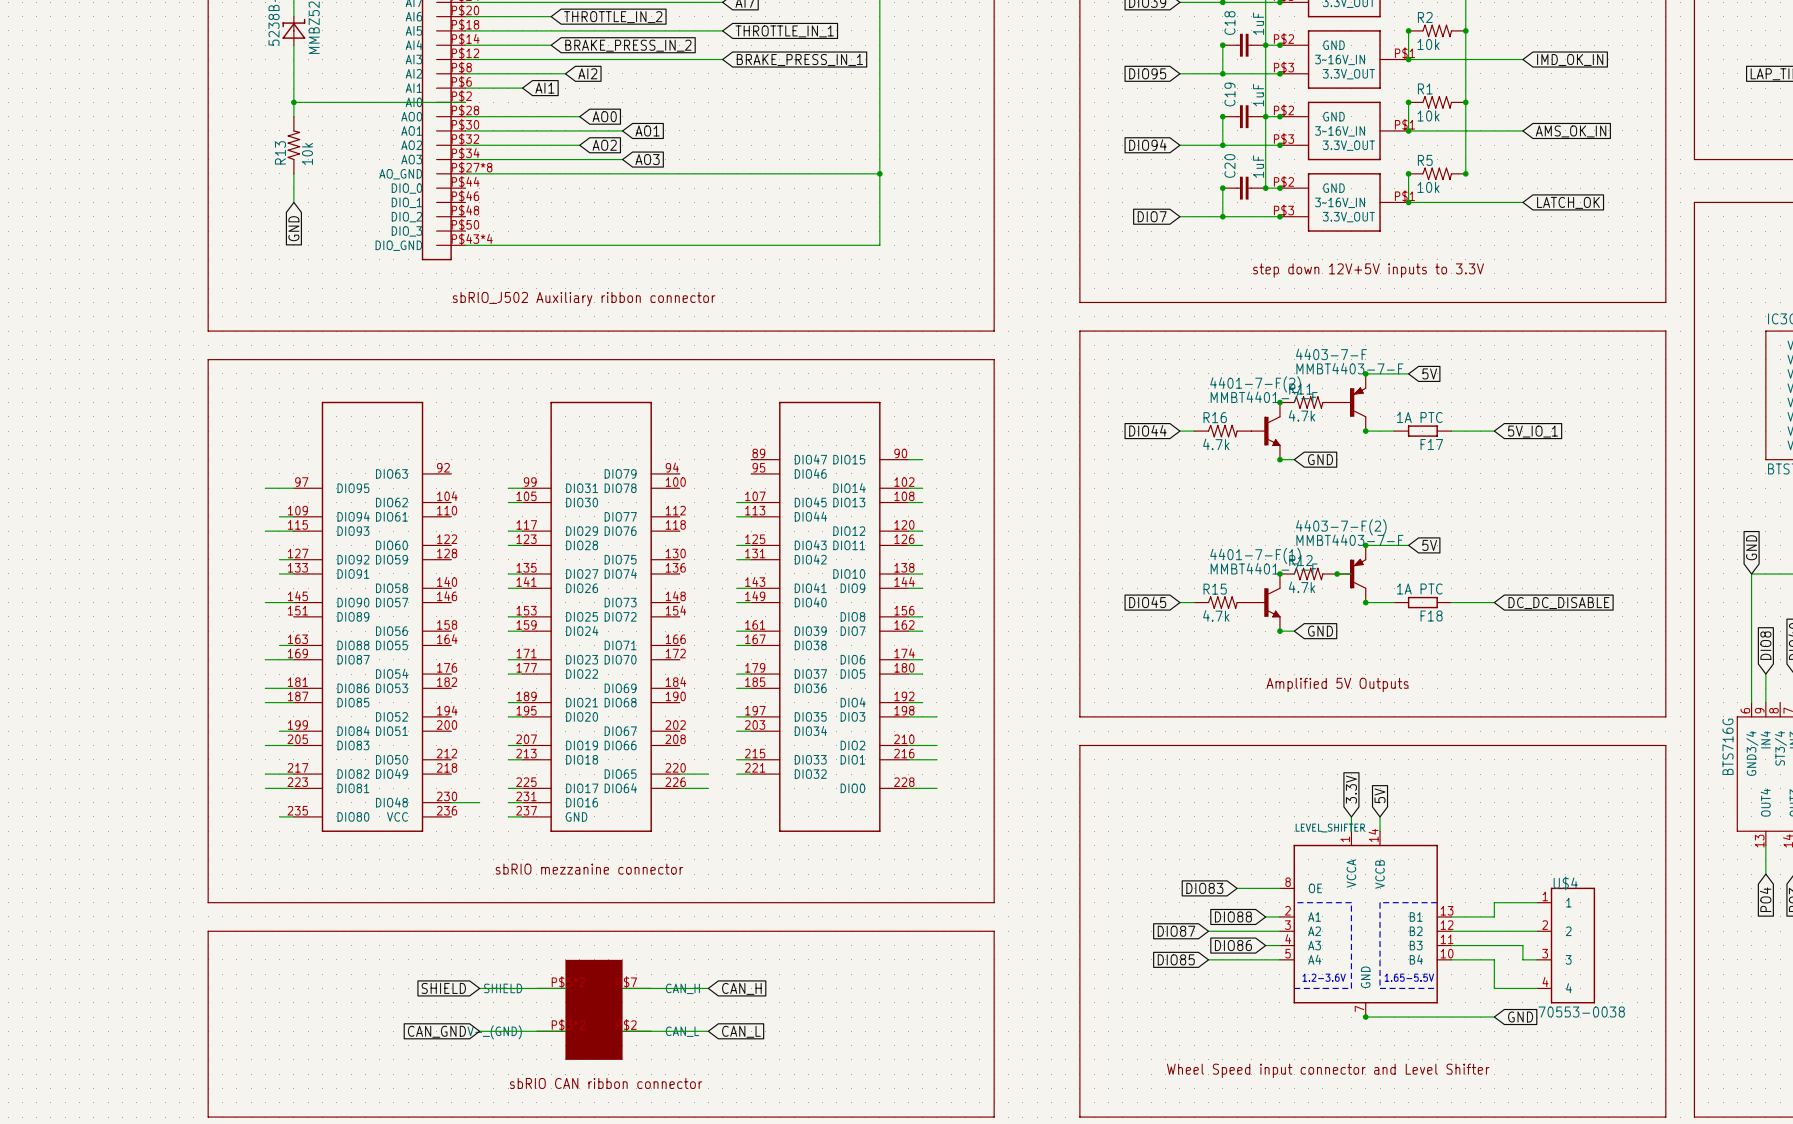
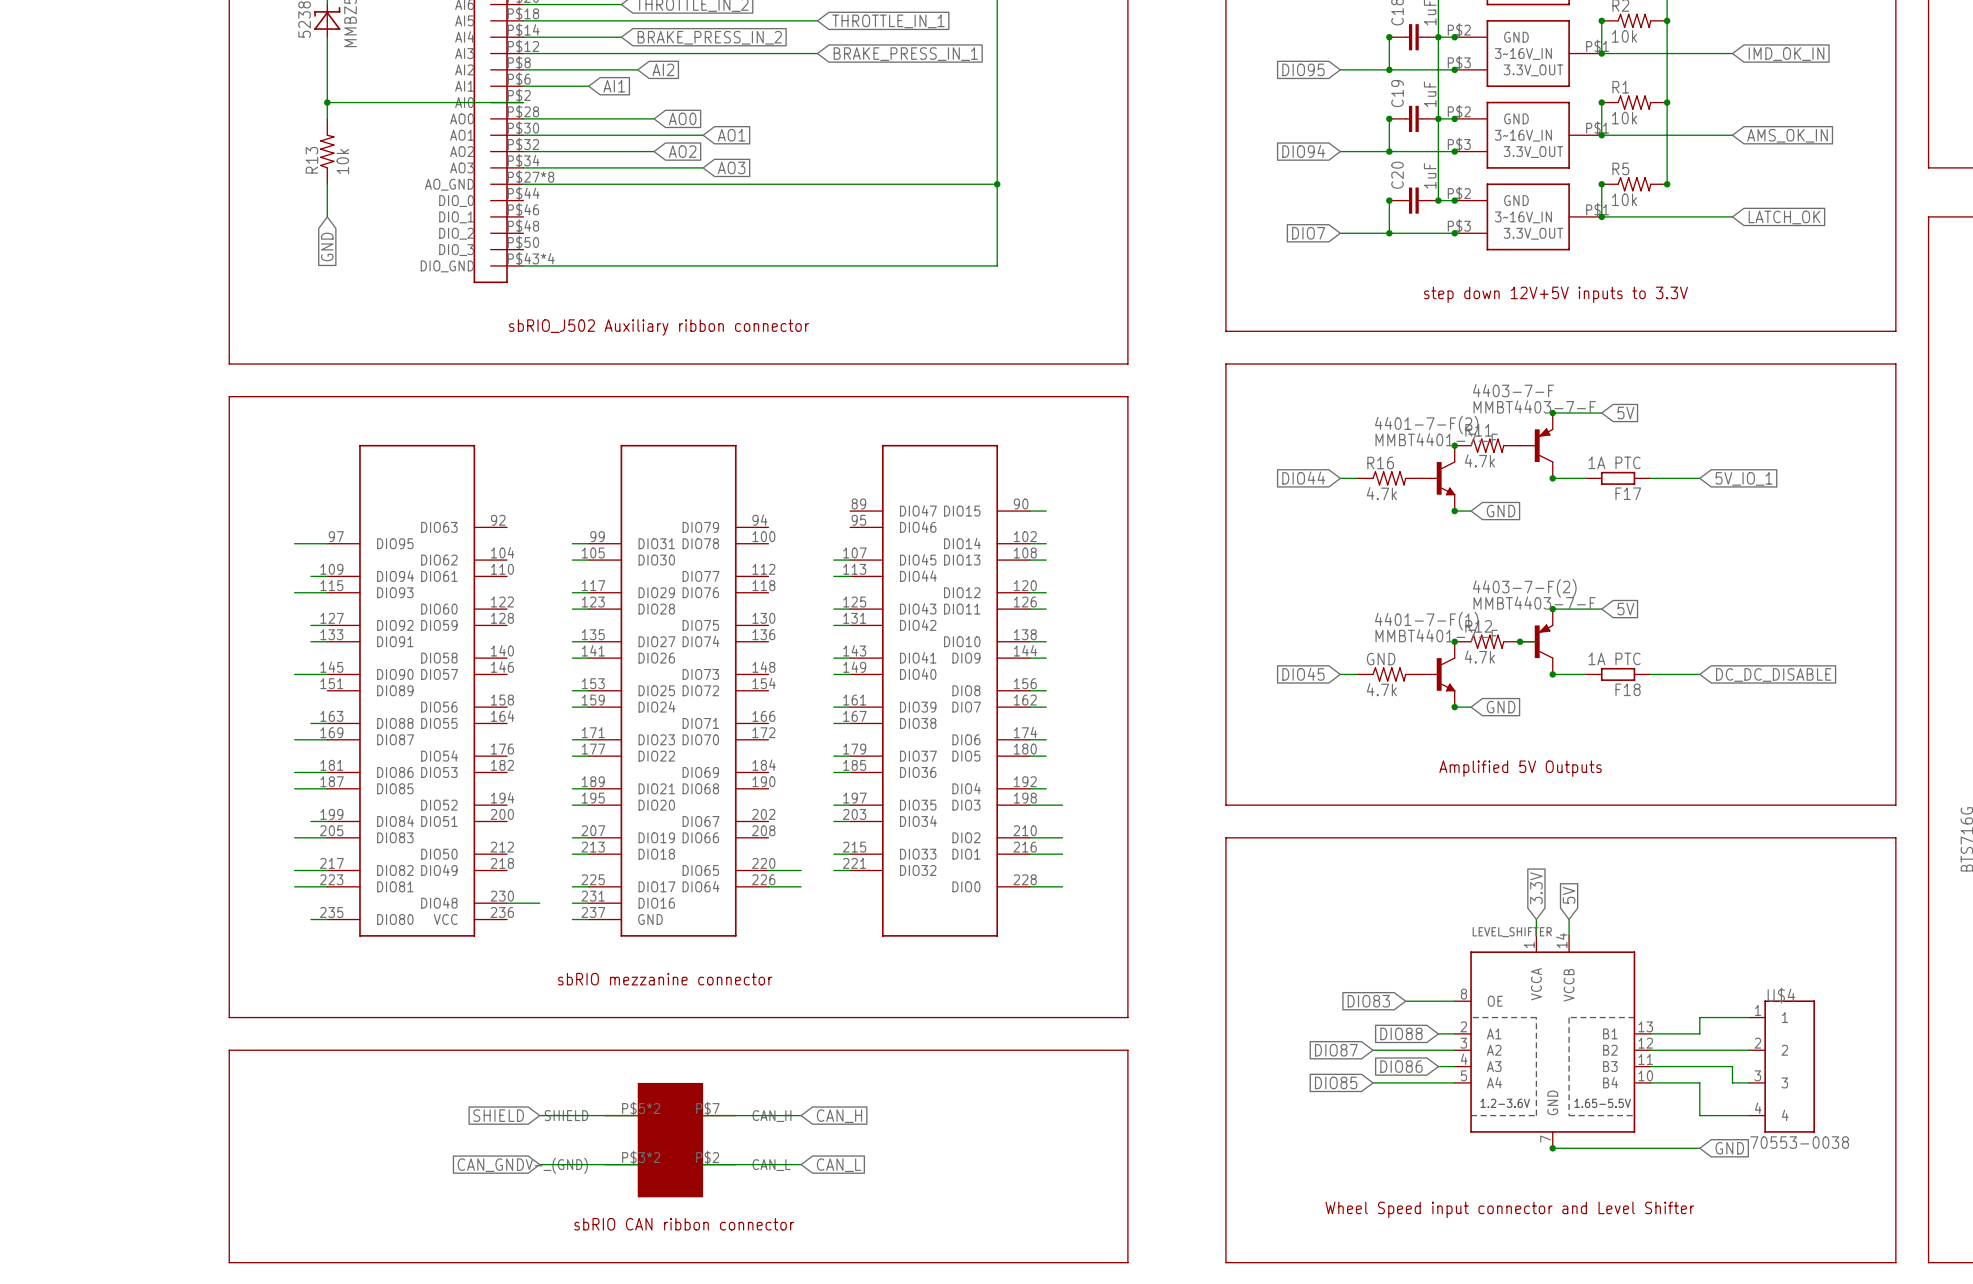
R15 name: R15 (1215, 589) -> GND (1381, 659)

